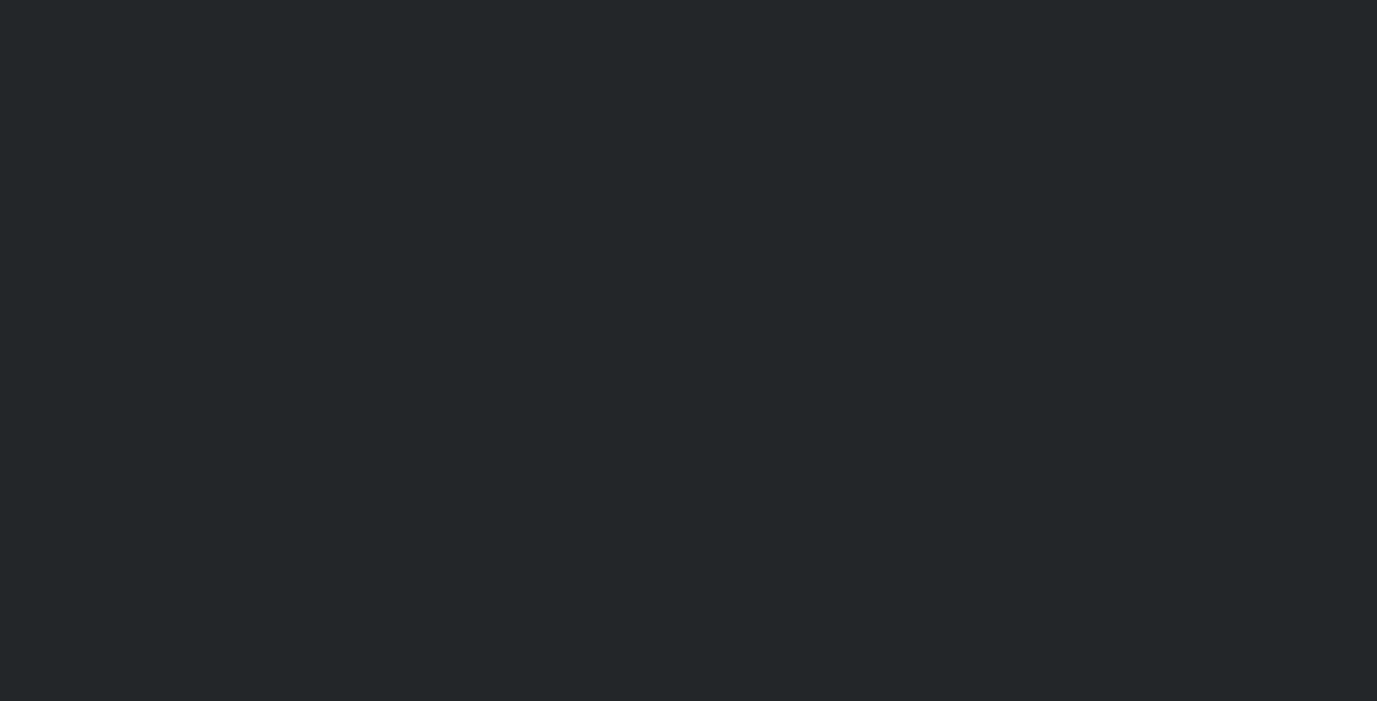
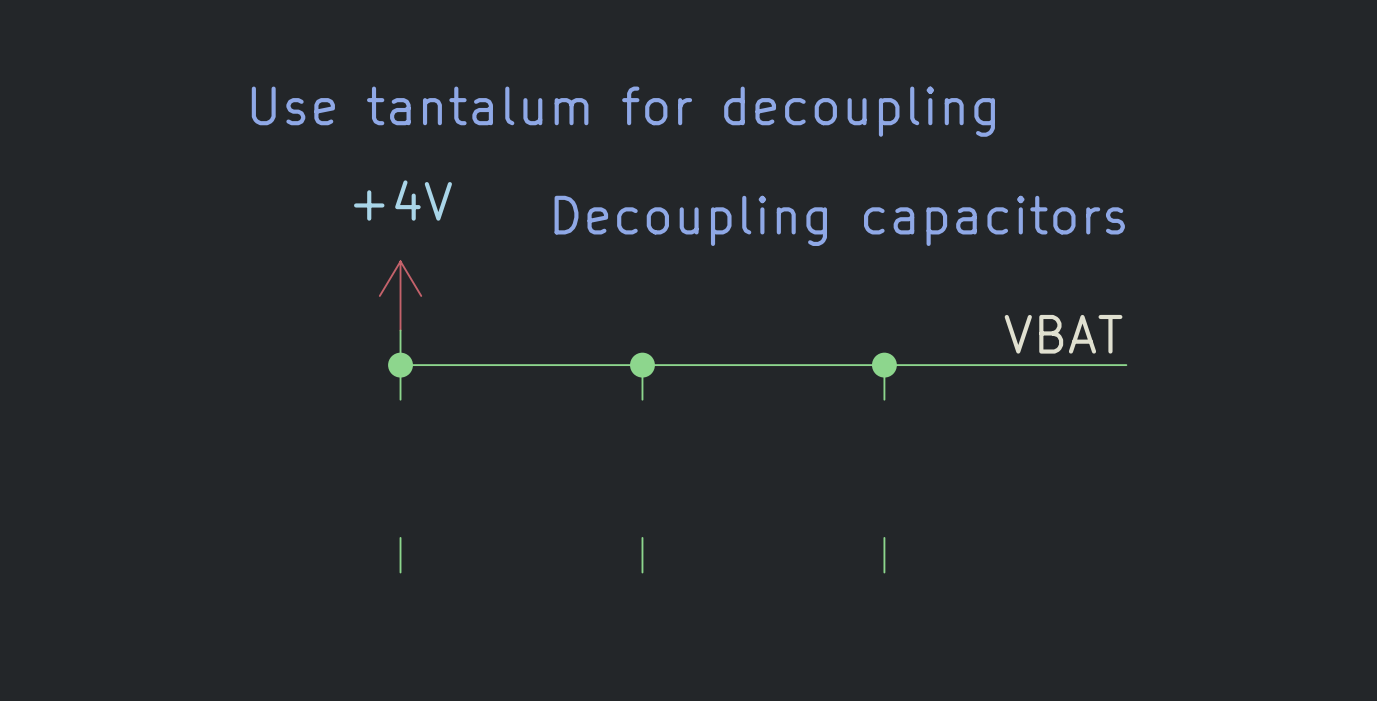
text: none -> Use tantalum for decoupling (623, 111)
text: none -> Decoupling capacitors (839, 220)
power symbol: none -> +4V (400, 295)
wire: none -> (400, 330) (400, 399)
label: none -> VBAT (1063, 334)
wire: none -> (400, 365) (1126, 365)
junction: none -> (400, 365)
wire: none -> (642, 365) (642, 399)
junction: none -> (642, 365)
wire: none -> (884, 365) (884, 399)
junction: none -> (884, 365)
wire: none -> (400, 537) (400, 572)
wire: none -> (642, 537) (642, 572)
wire: none -> (884, 537) (884, 572)

